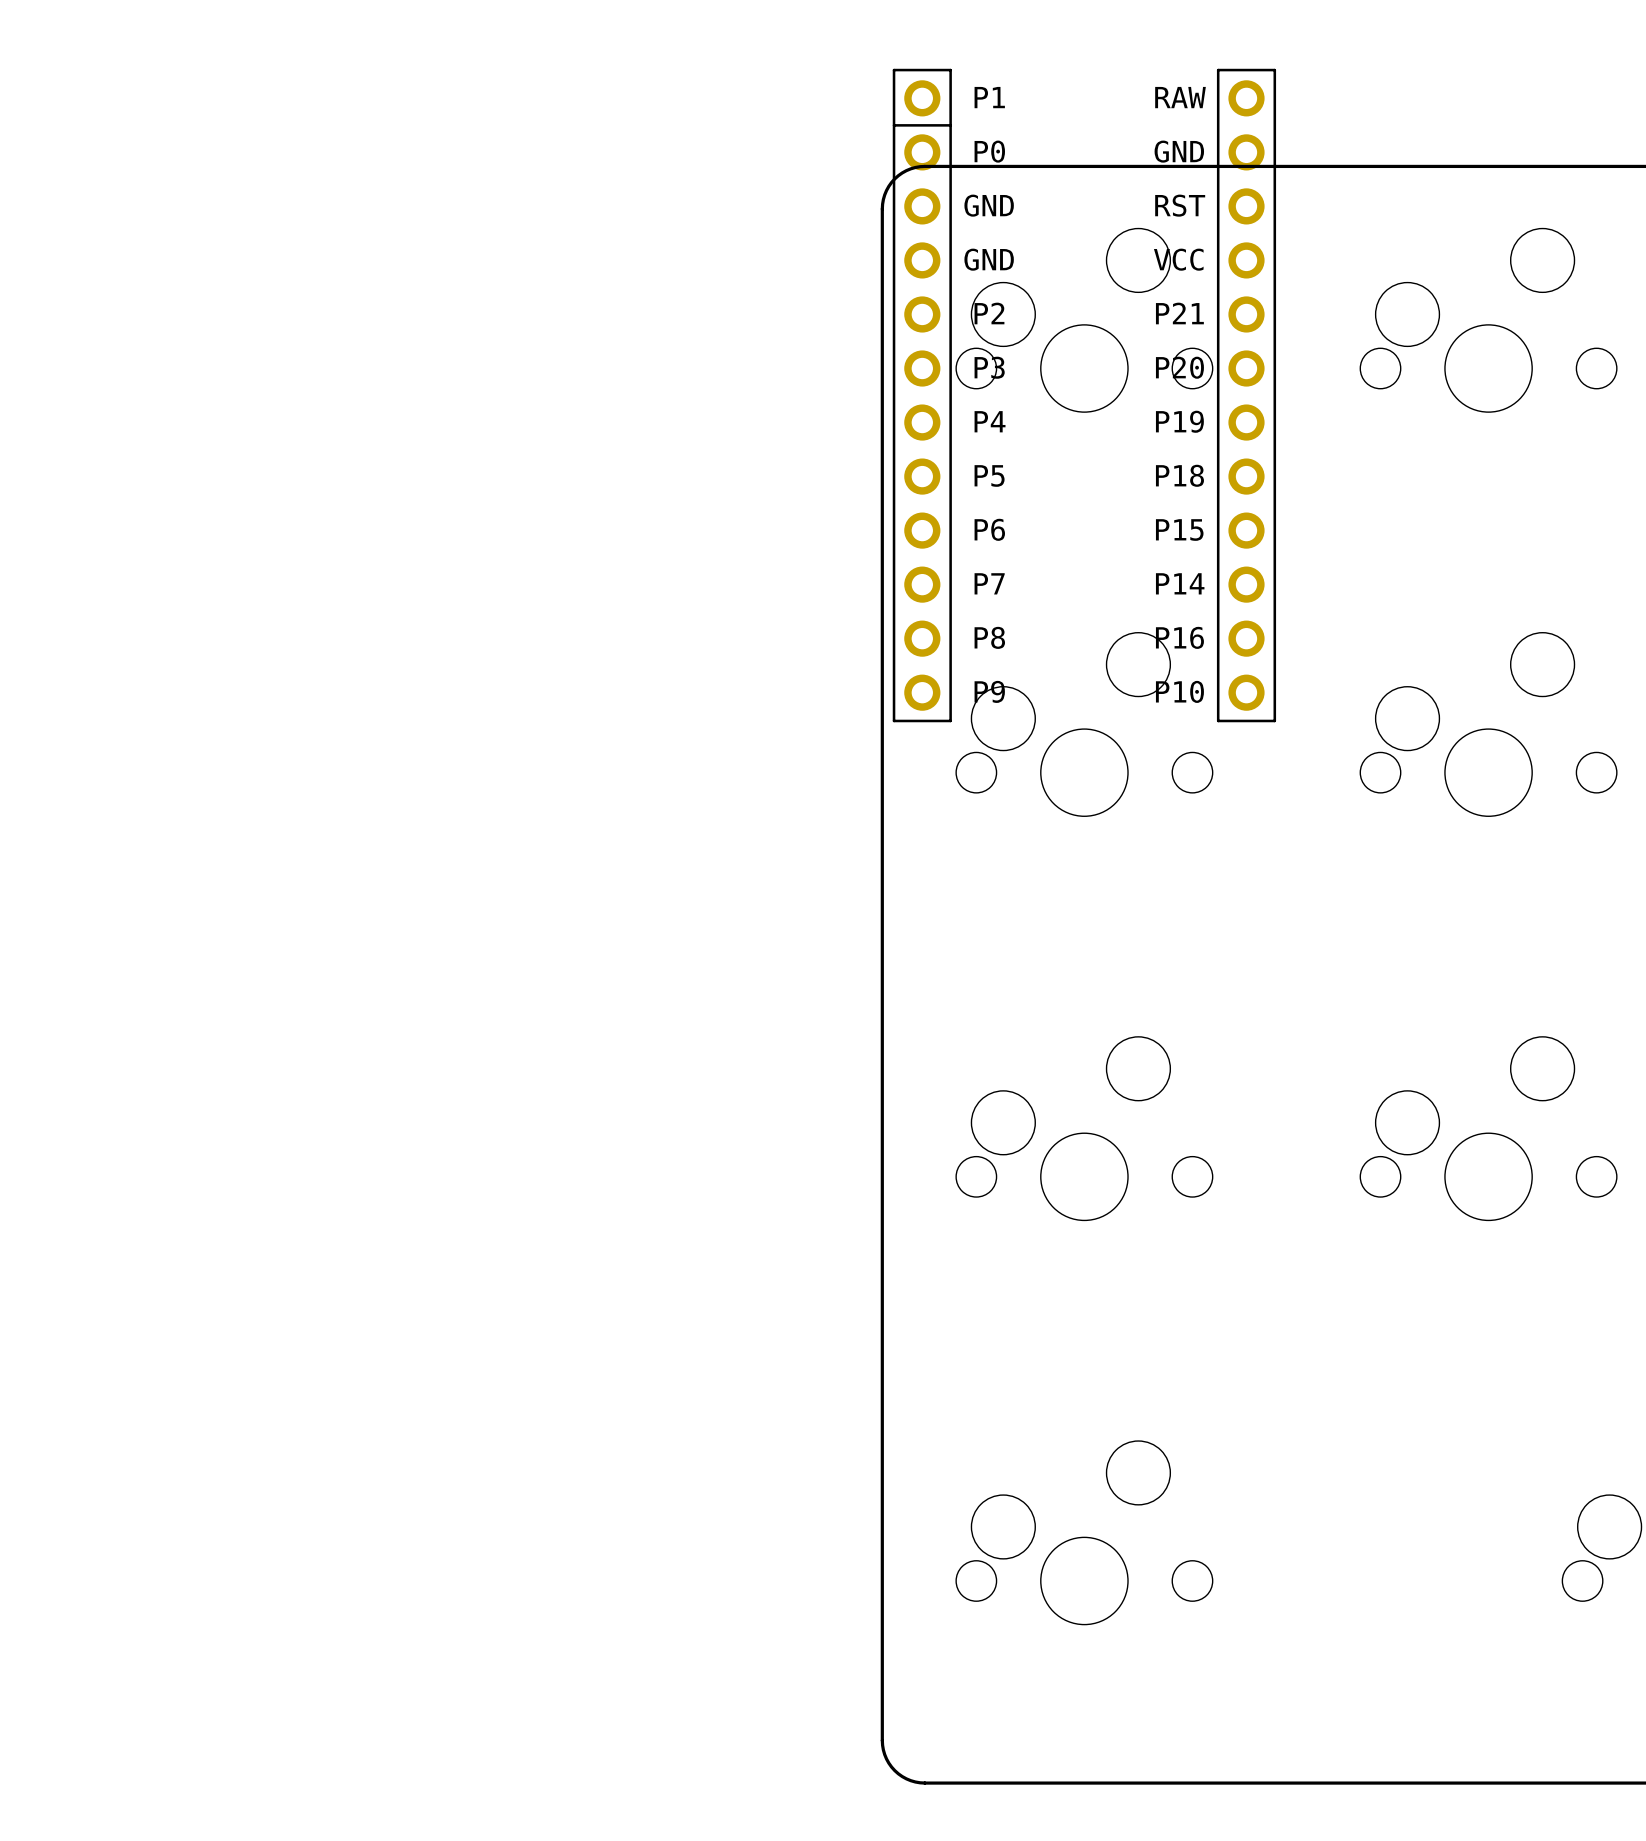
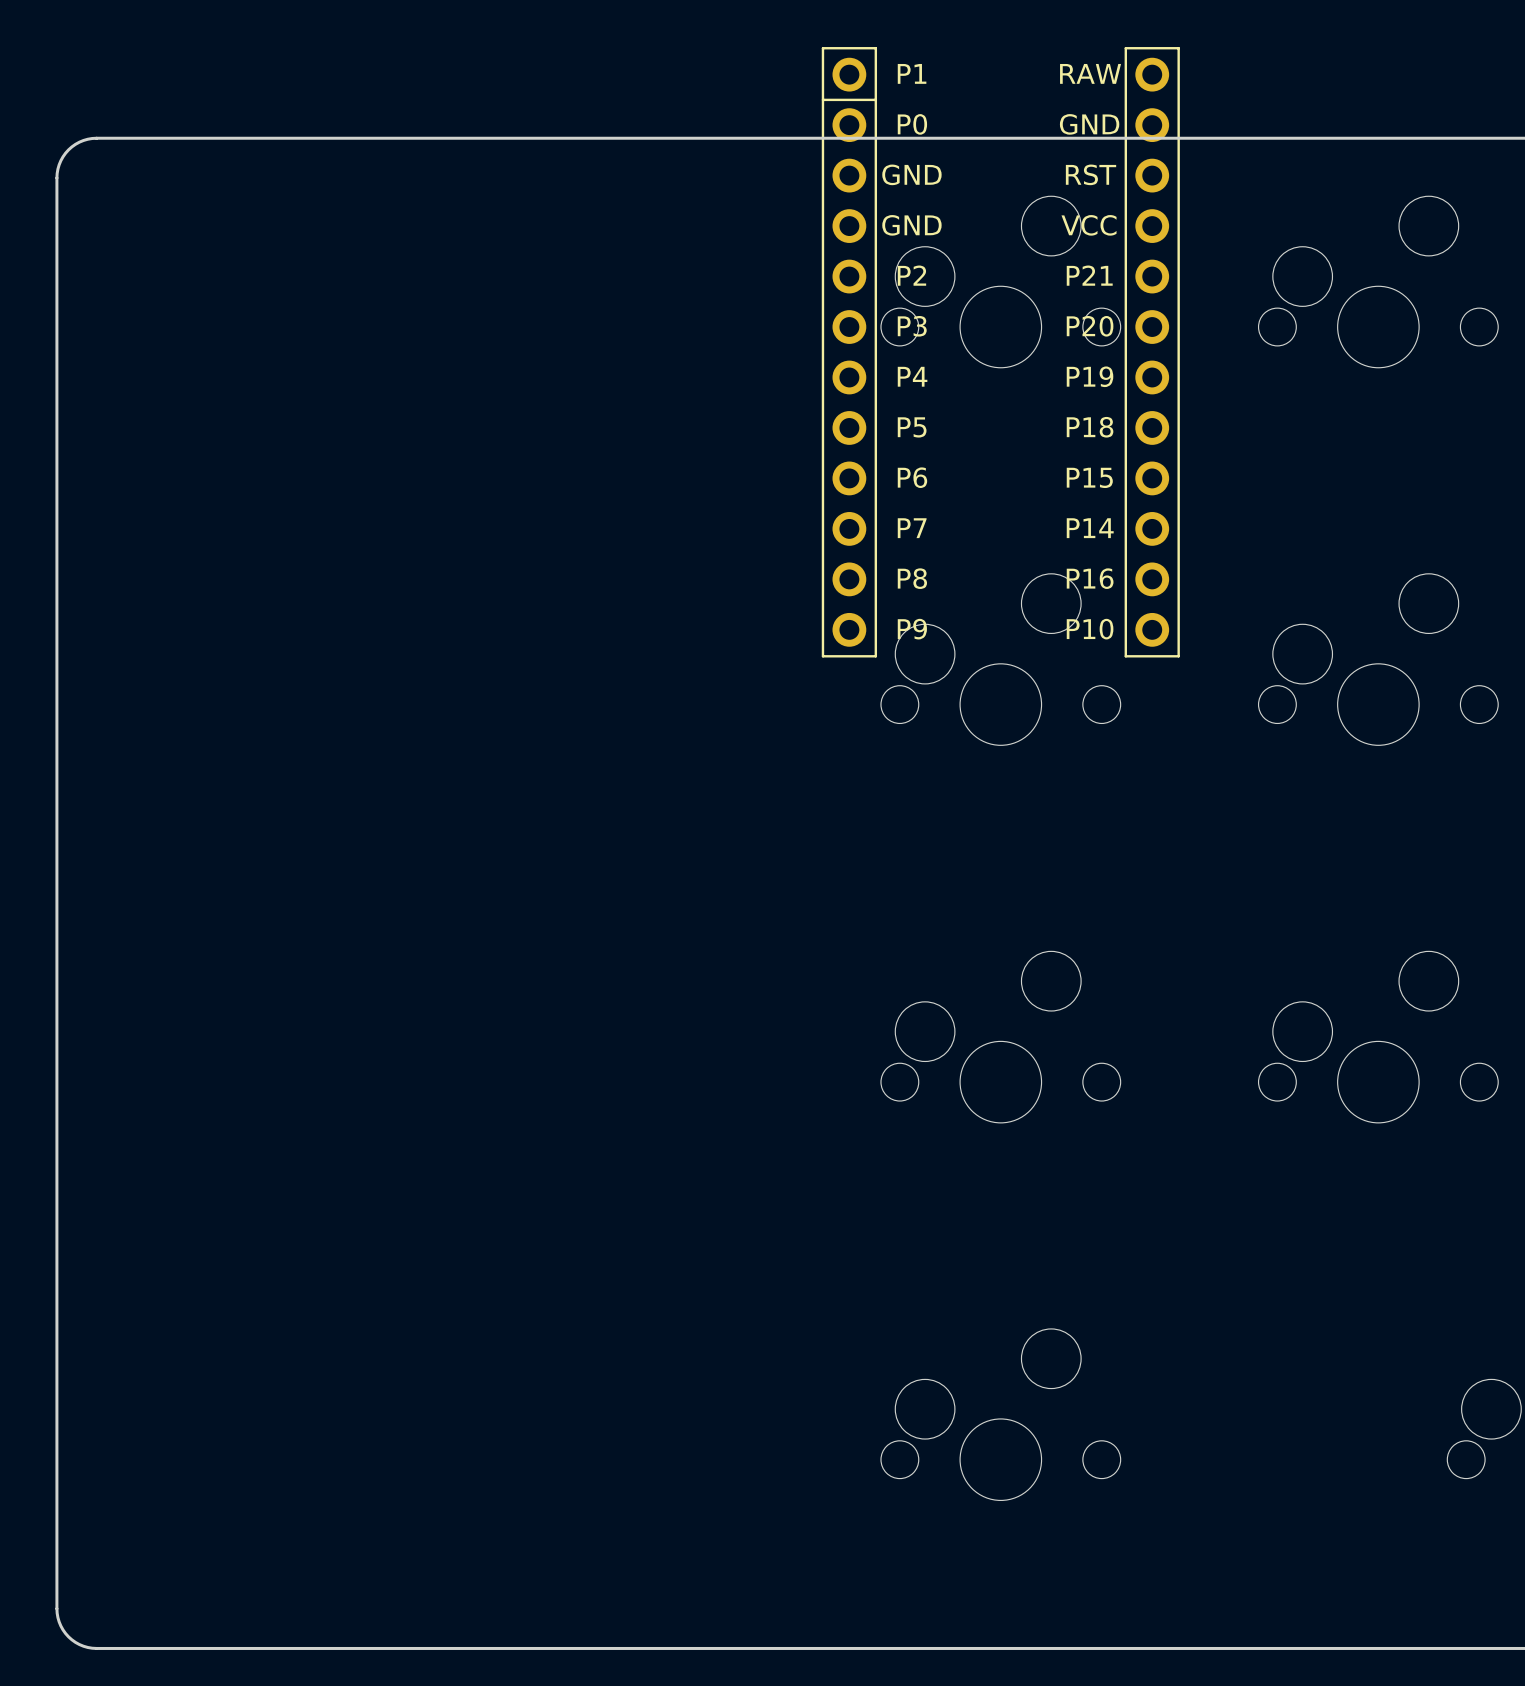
board edge: (924, 166) (910, 168) (894, 178) (886, 190) (882, 208) (882, 1740) (884, 1754) (894, 1770) (910, 1780) (924, 1783) -> (851, 138) (96, 138) (83, 140) (68, 149) (59, 164) (56, 177) (56, 1608) (60, 1625) (75, 1642) (96, 1648) (851, 1648)

